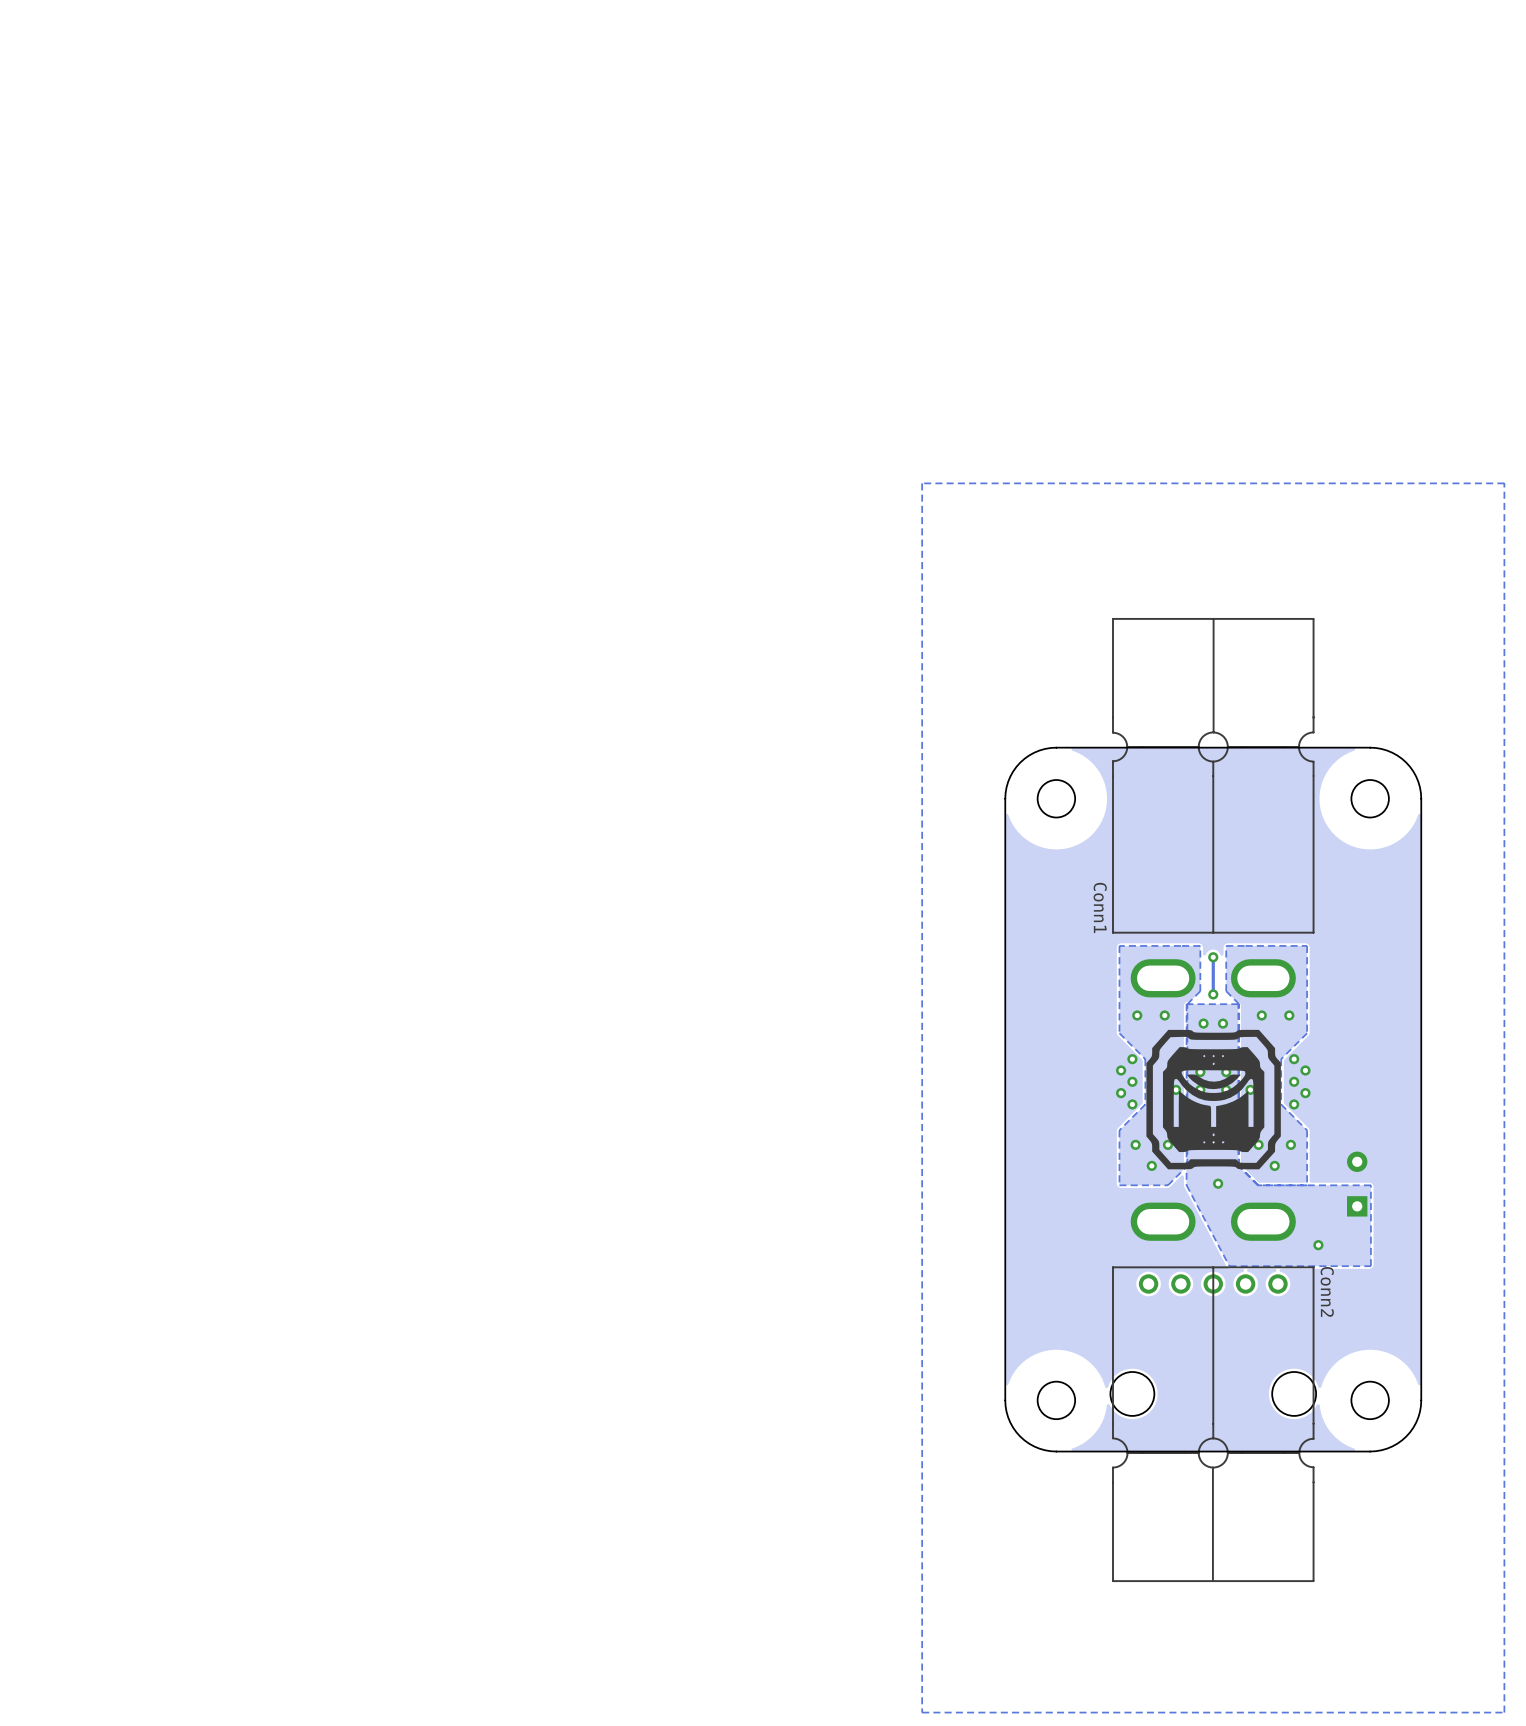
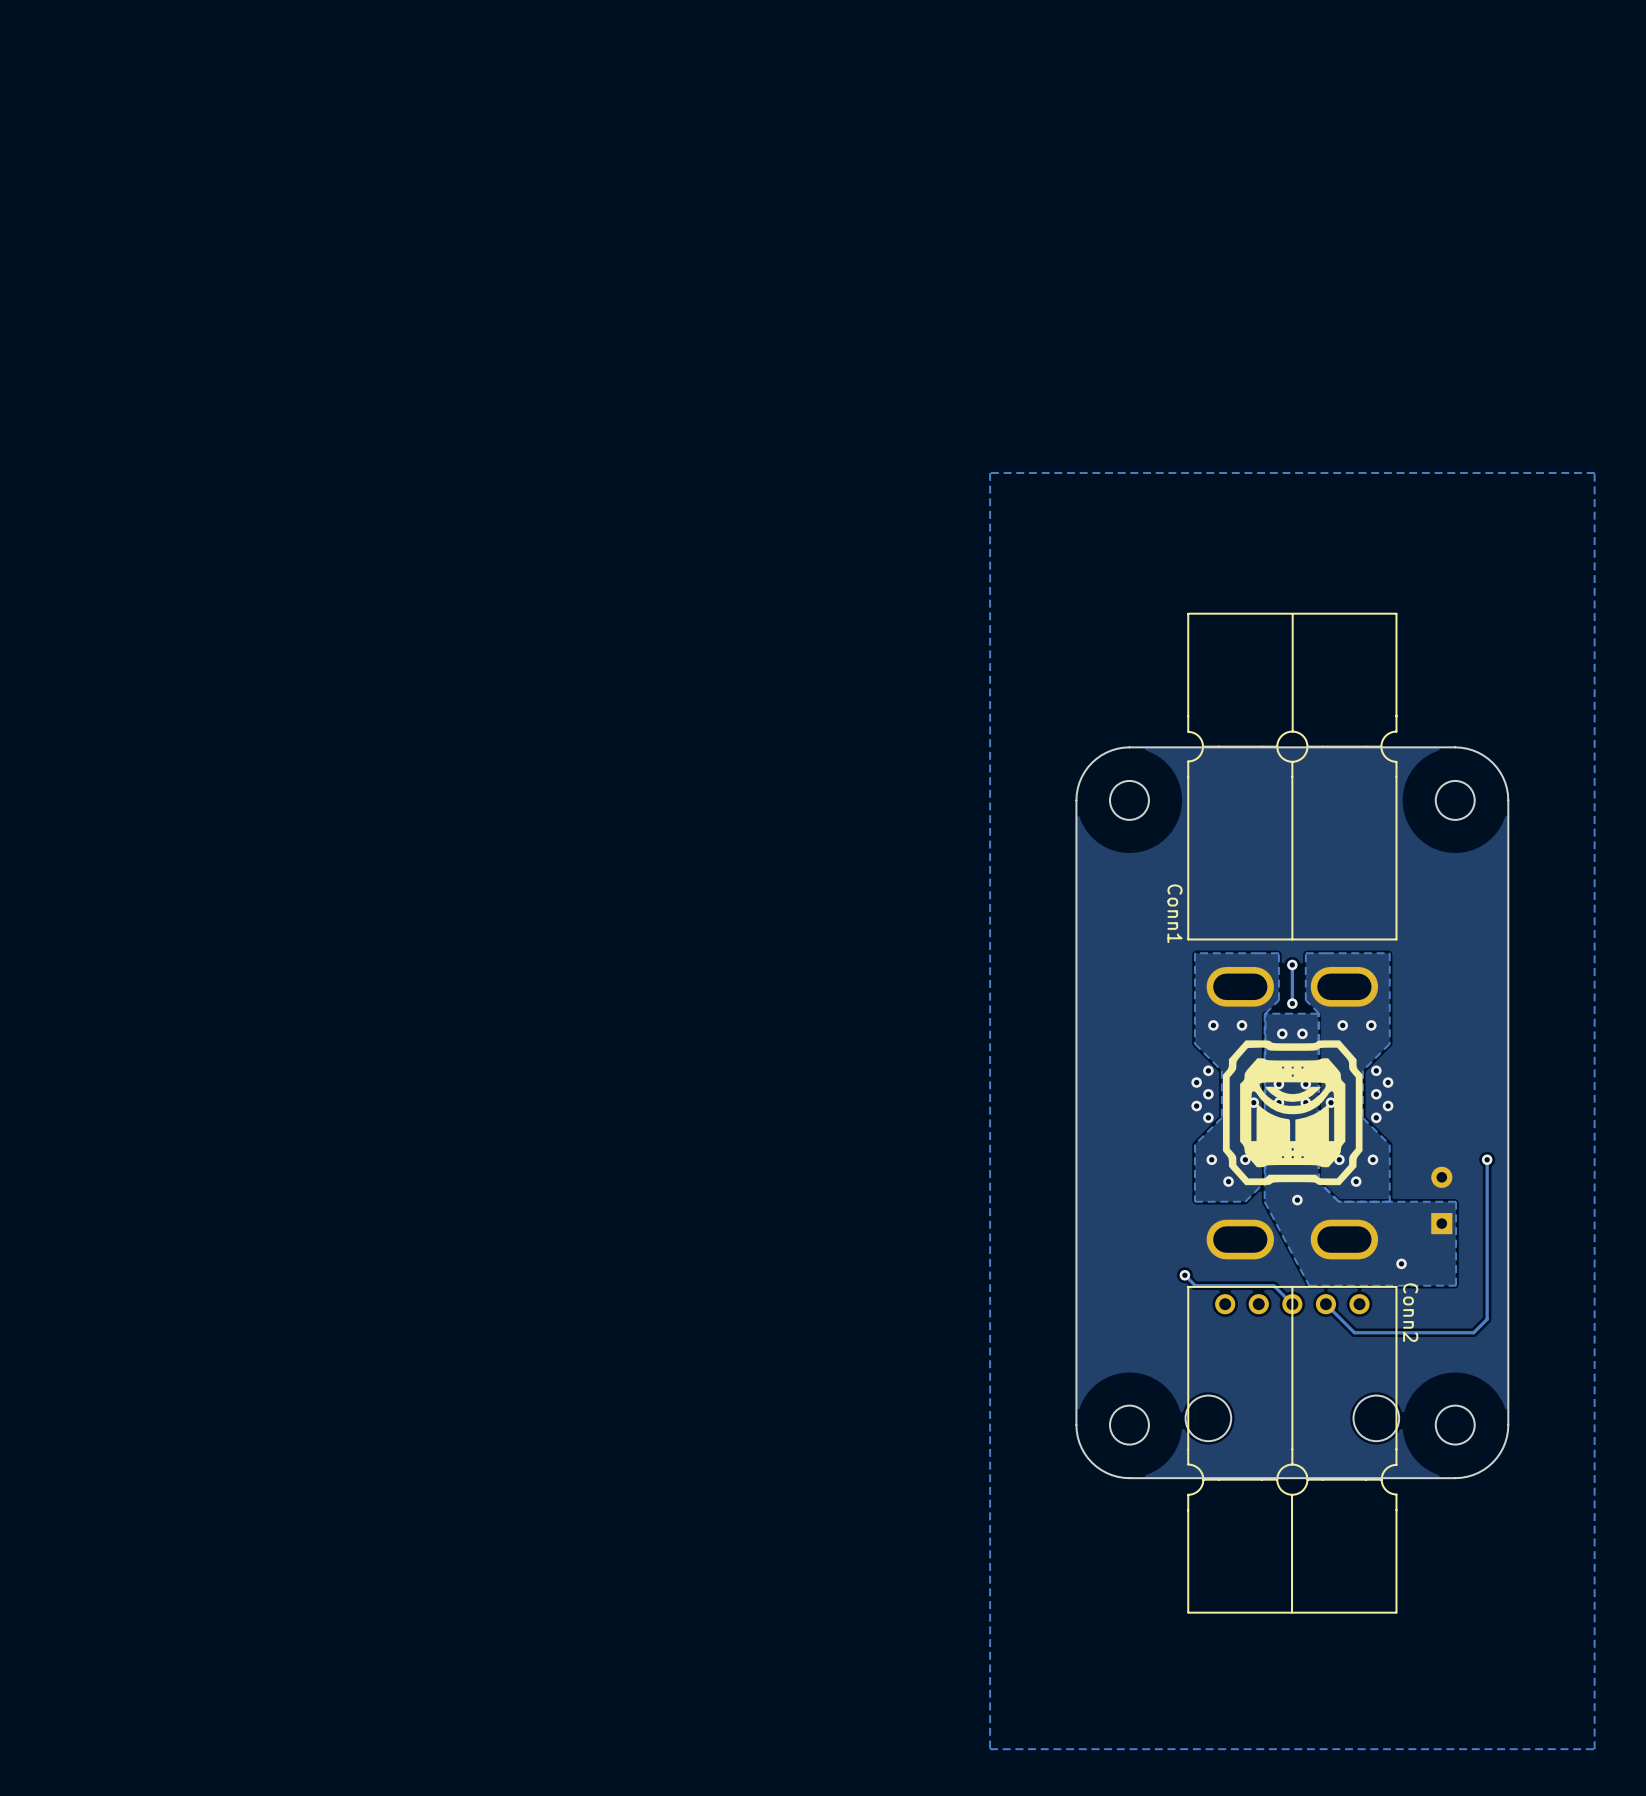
track: none -> (1487, 1159) (1487, 1319) (1473, 1332) (1354, 1332) (1325, 1304)
via: none -> (1487, 1159)
track: none -> (1184, 1275) (1195, 1285) (1273, 1285) (1292, 1304)
via: none -> (1184, 1275)

